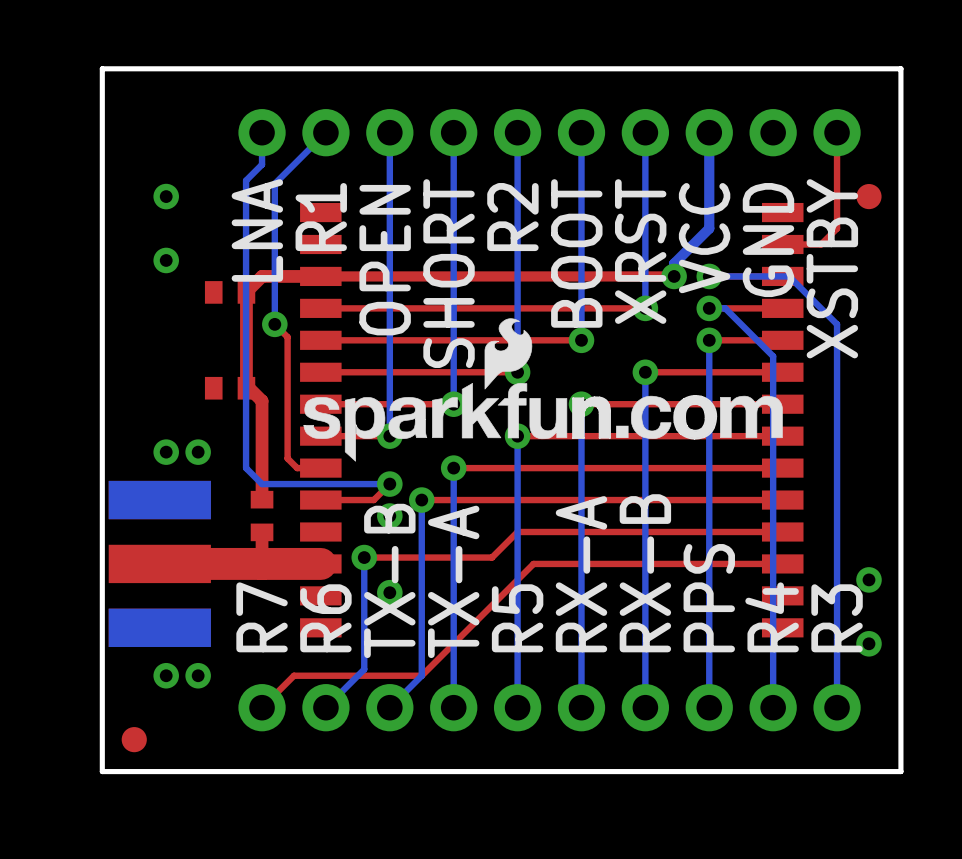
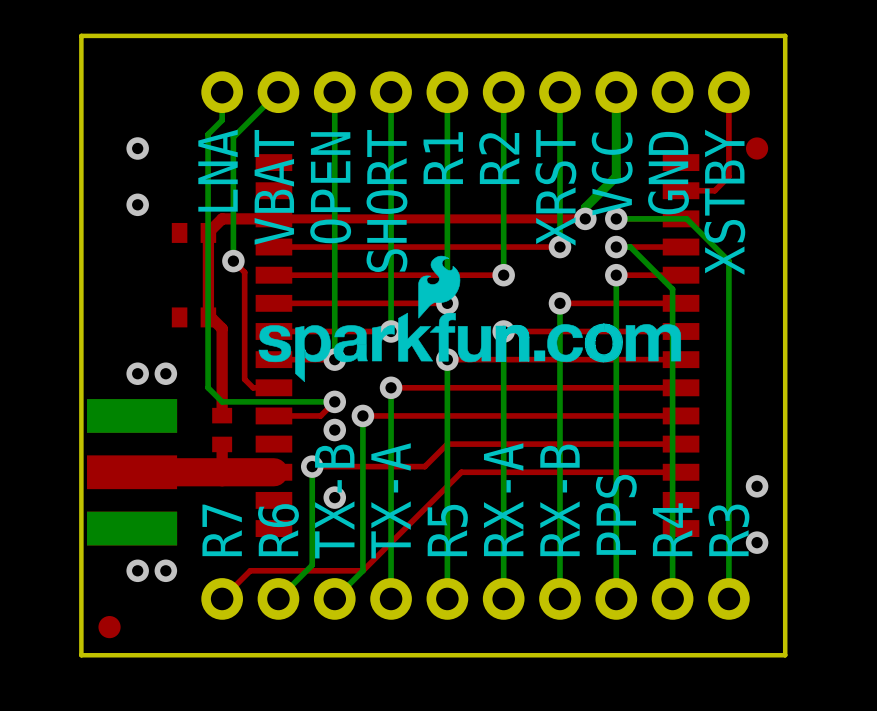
text: R1 (321, 217) -> VBAT (274, 187)
text: R2 (512, 217) -> R1 (443, 158)
text: BOOT (576, 253) -> R2 (499, 158)

